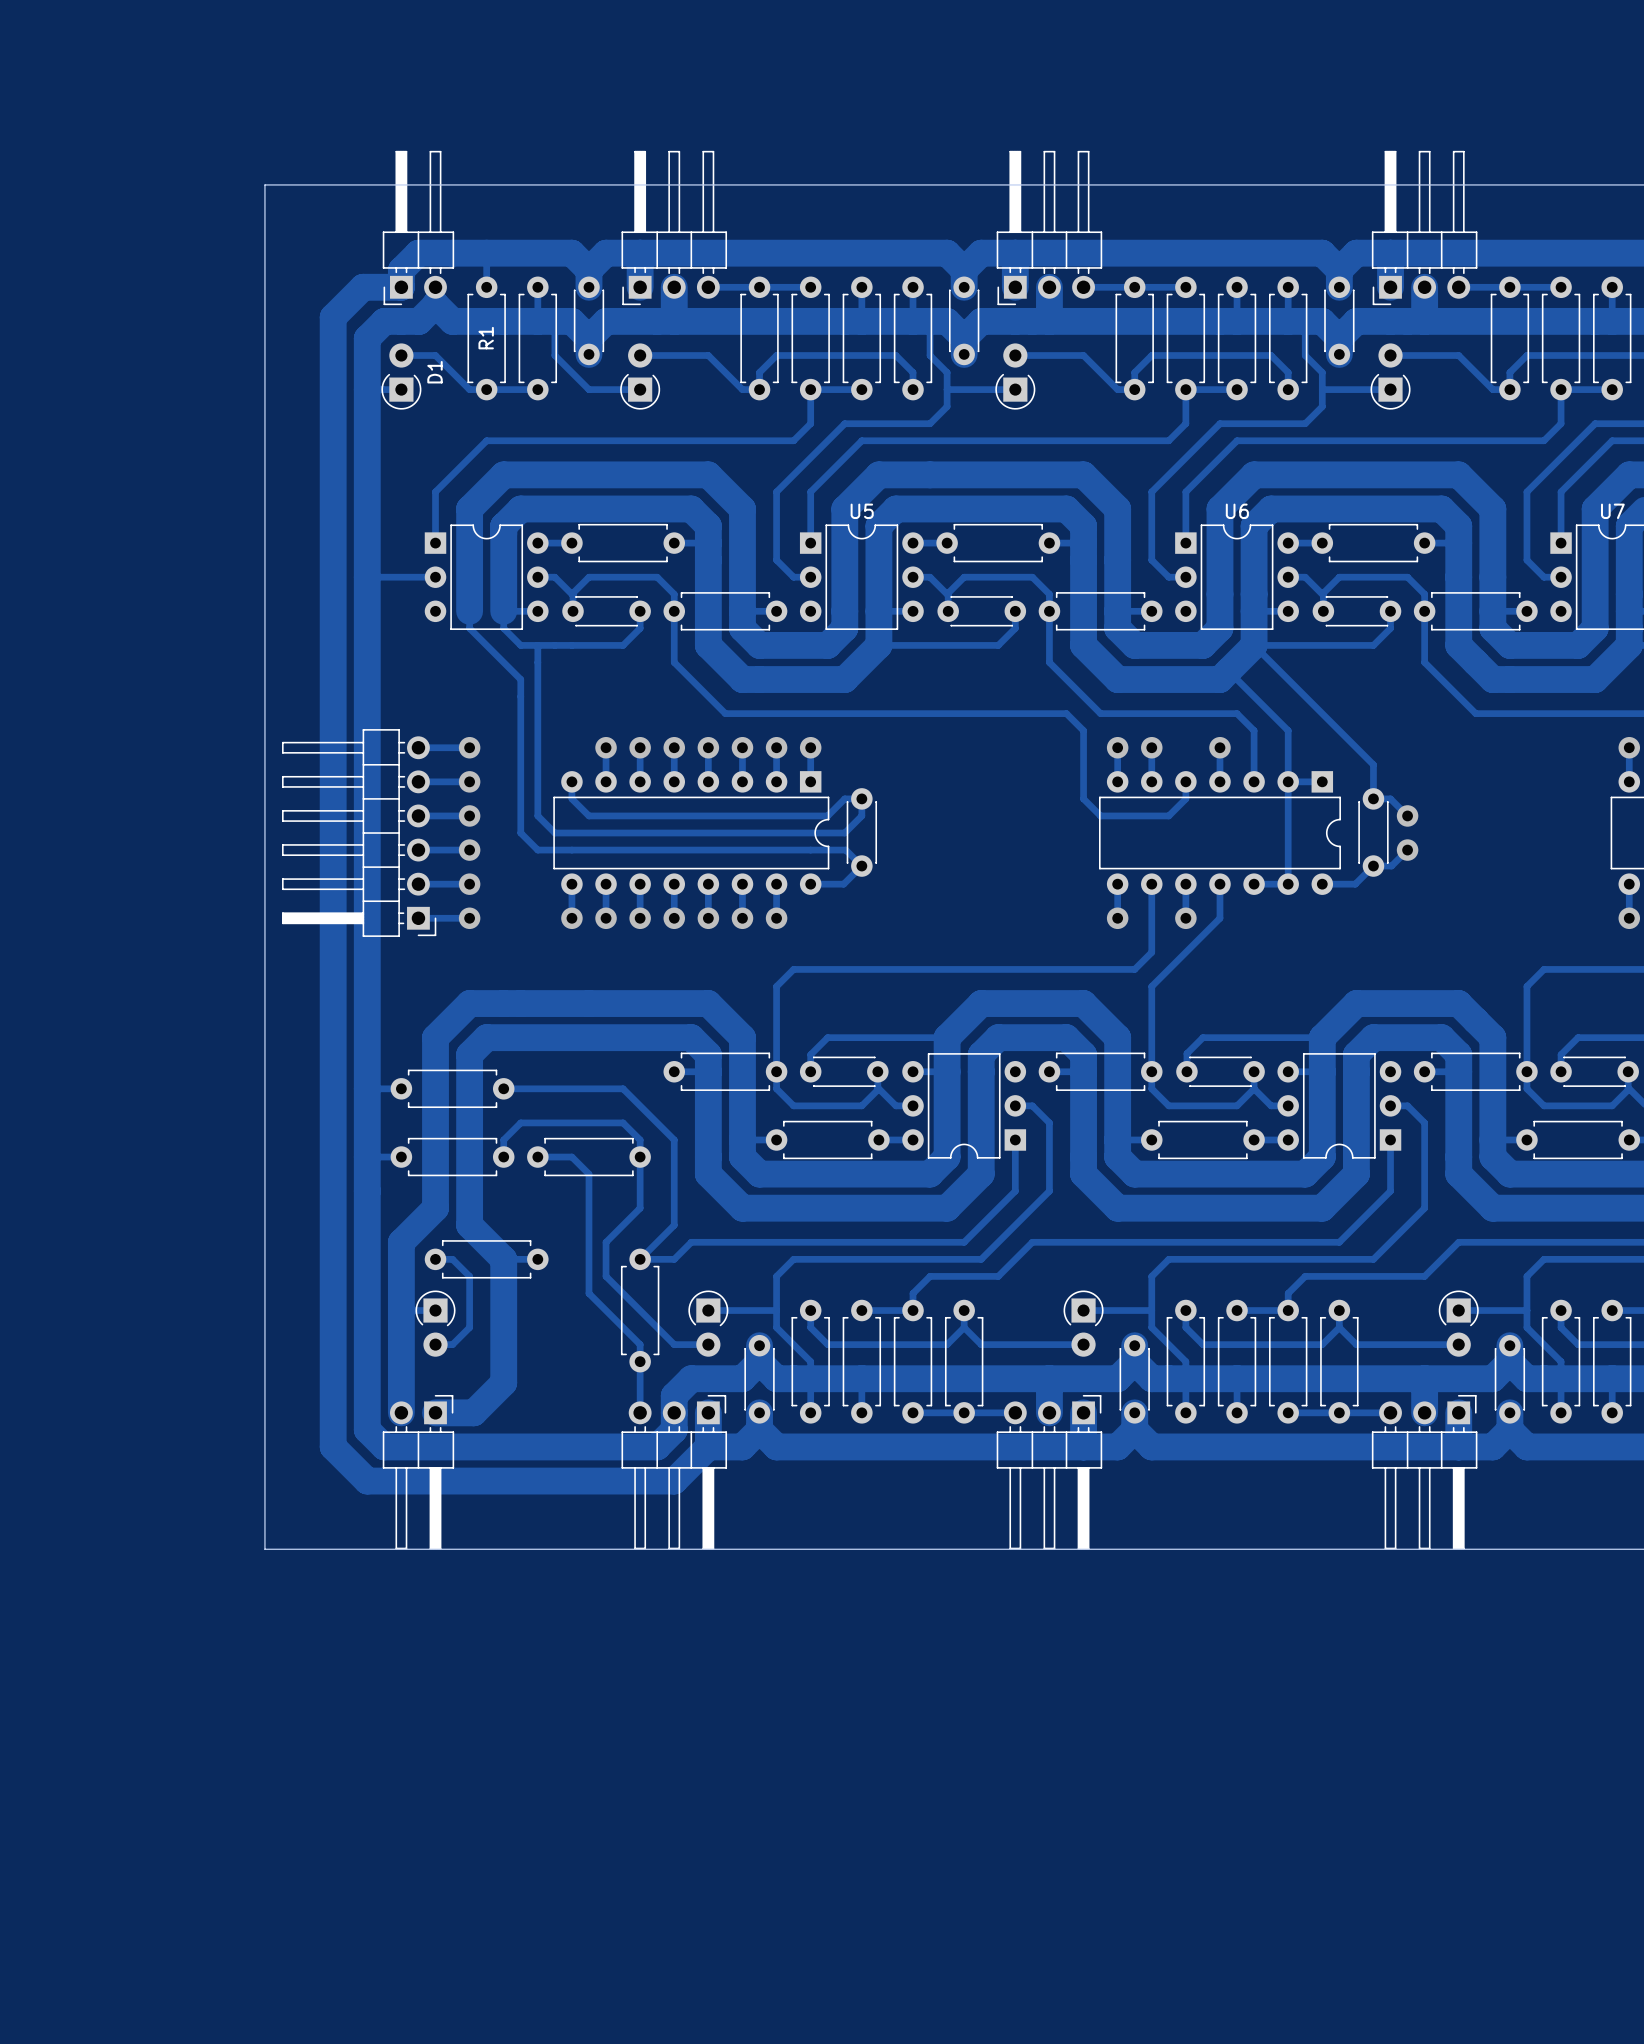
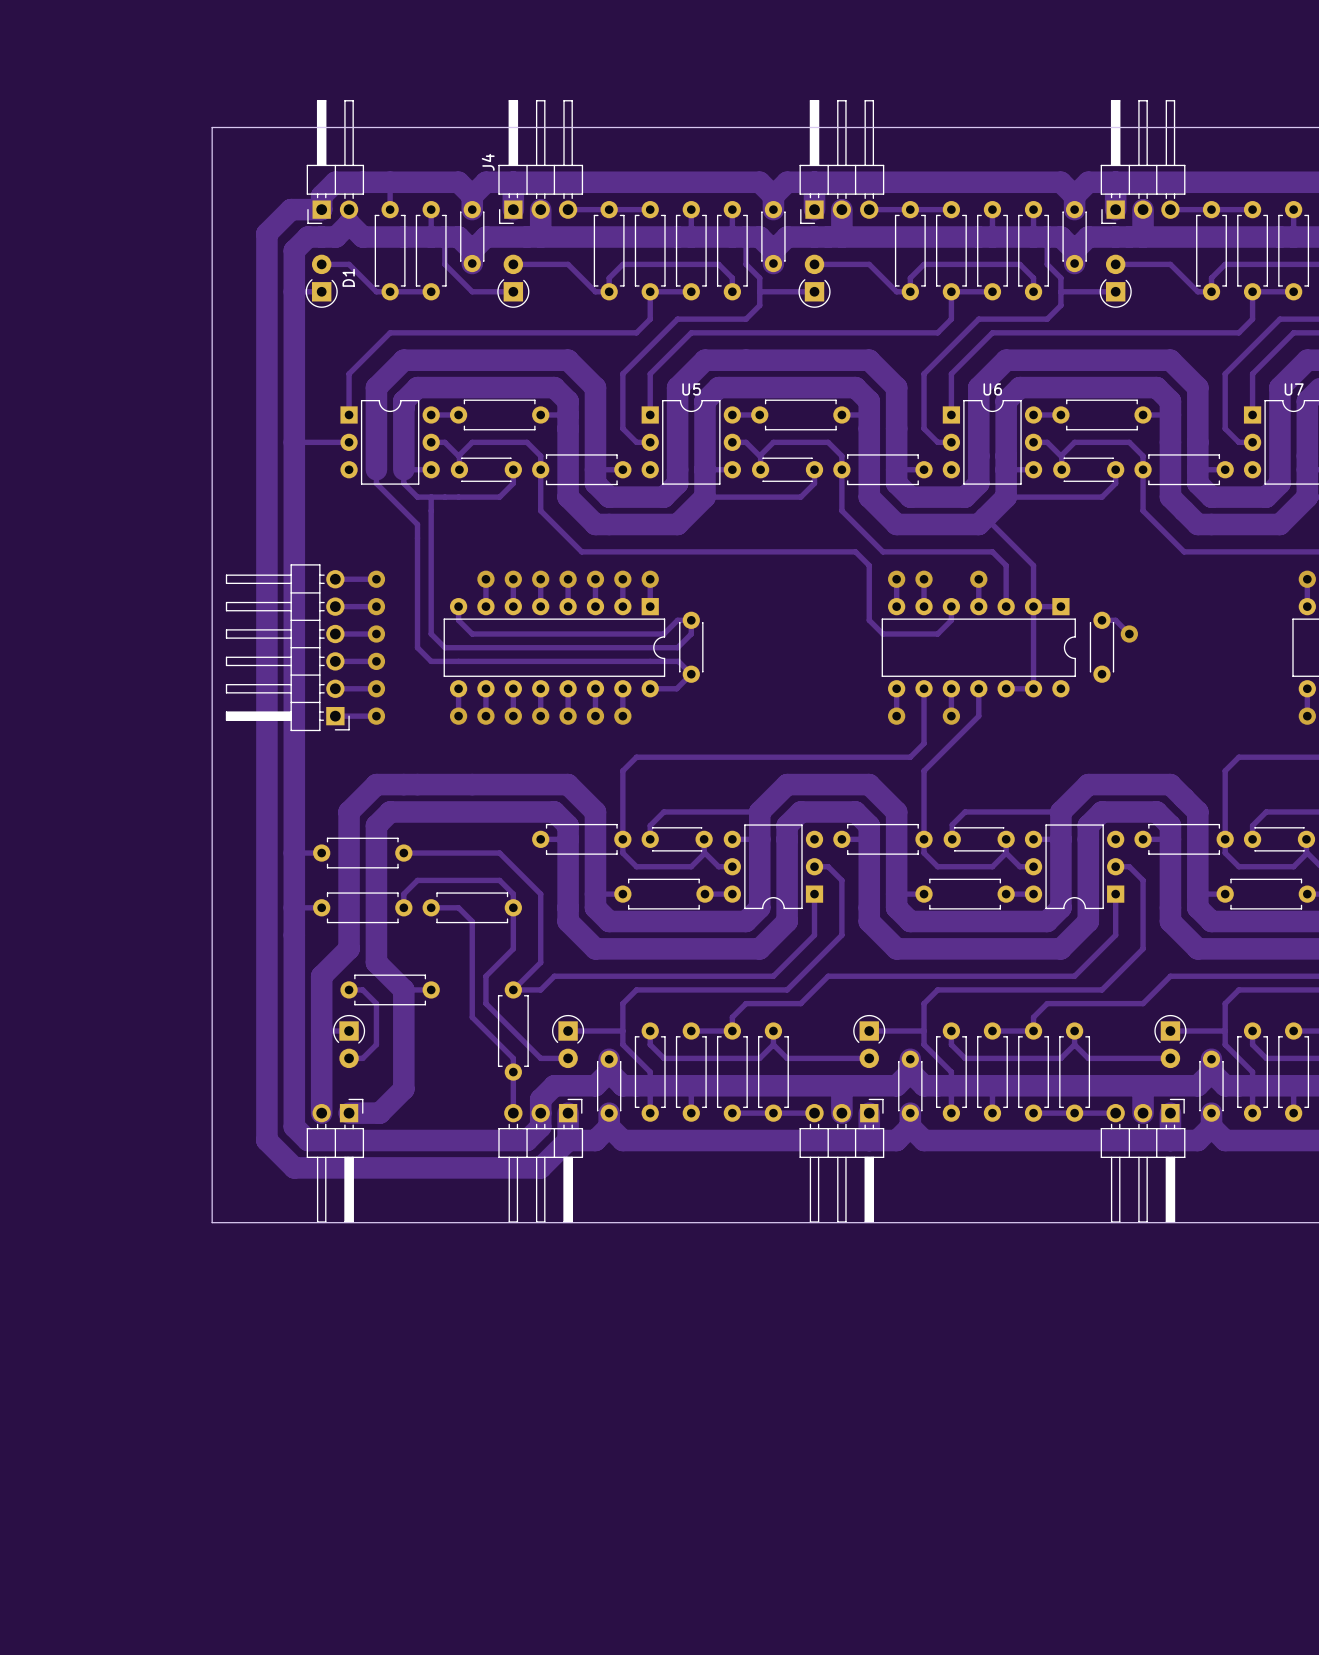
J4 name: none -> J4 (488, 162)
R1 name: R1 (486, 338) -> none
track: (1254, 645) (1373, 764) (1373, 798) -> none
track: (1407, 850) (1391, 866) (1373, 866) (1355, 884) (1322, 884) -> none
via: (1407, 850) -> none

